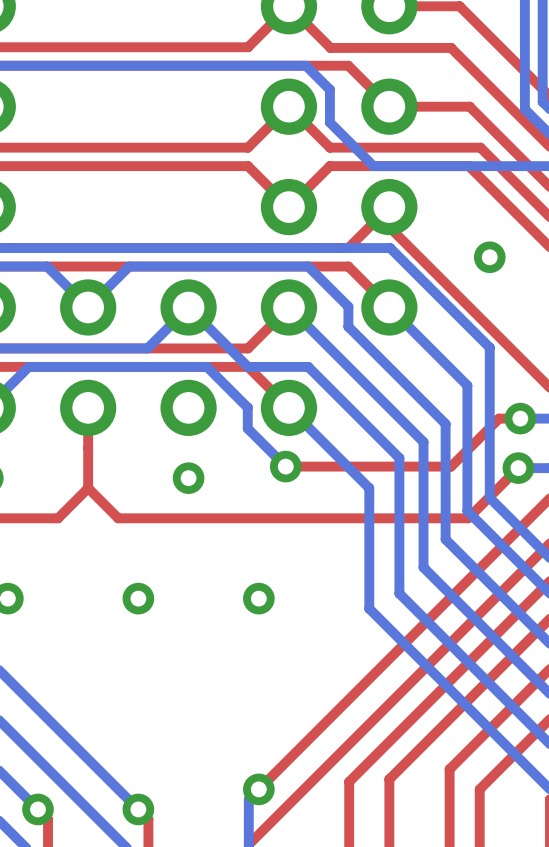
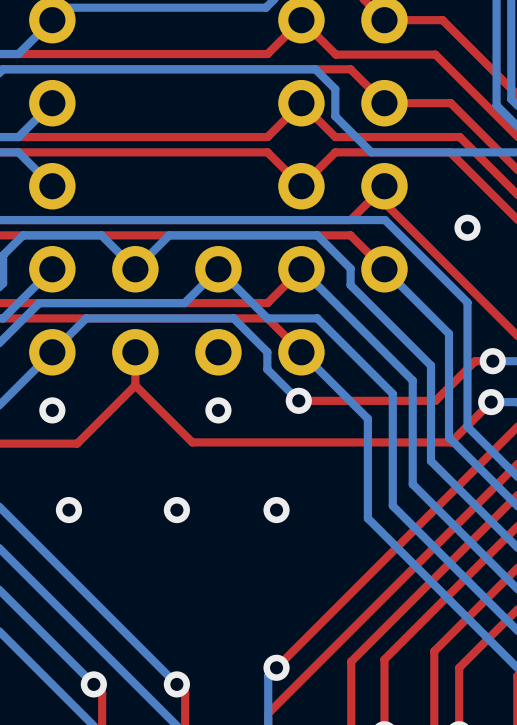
top track: (88, 448) (88, 488) -> none
top track: (88, 488) (118, 518) (469, 516) -> (77, 443) (135, 385) (192, 442) (450, 442)
top track: (88, 488) (58, 518) (17, 518) -> none

